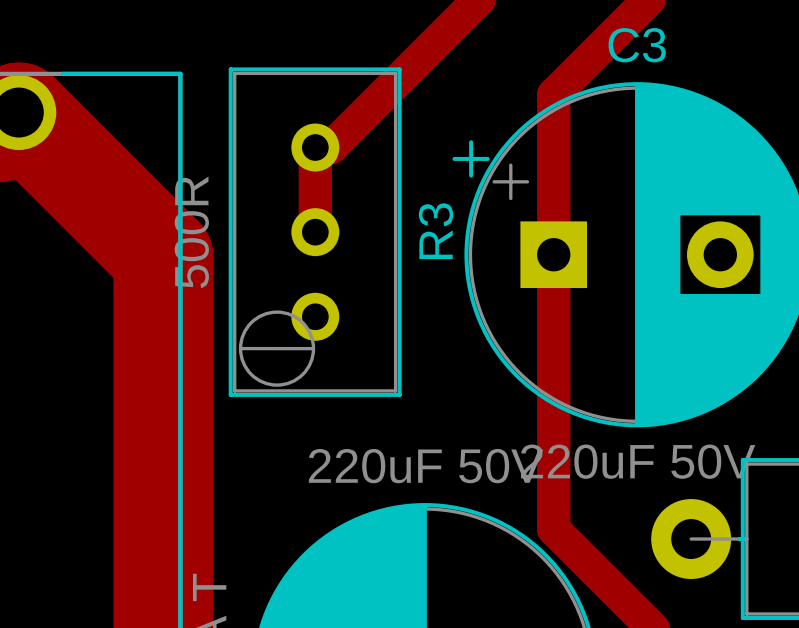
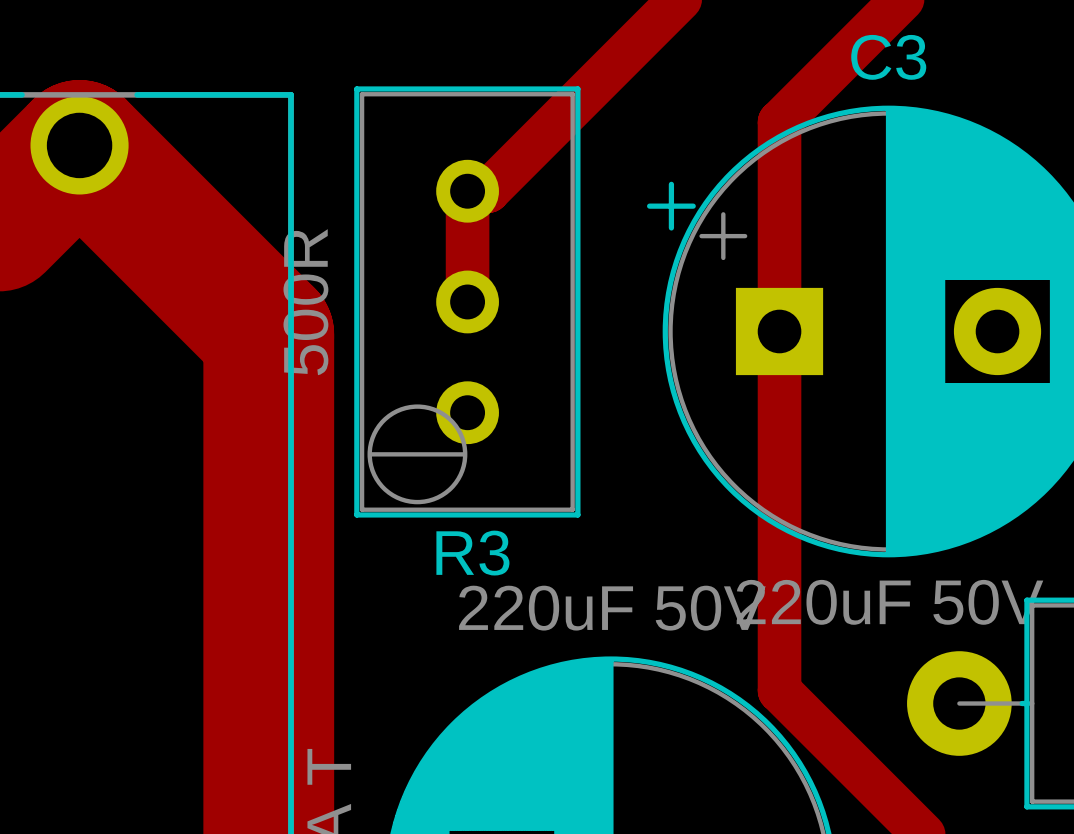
R3 name rotation: 0° (436, 231) -> 90° clockwise (472, 553)
R3 name position: R3 (436, 231) -> R3 (472, 553)

